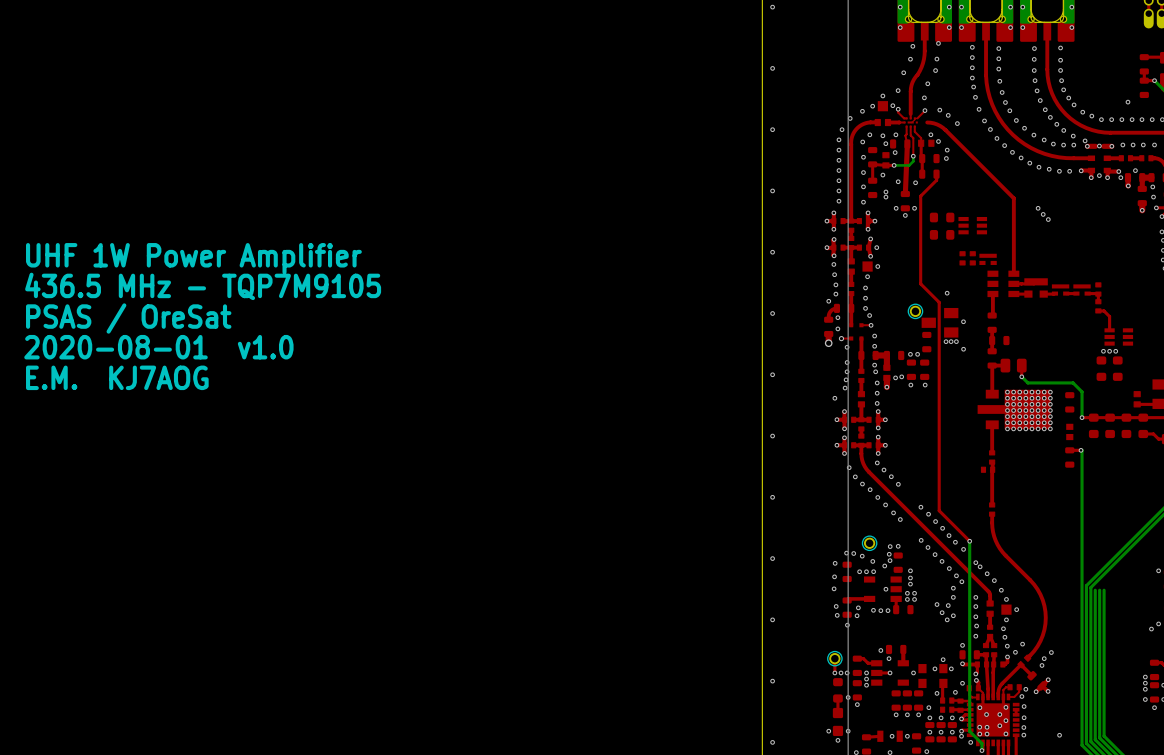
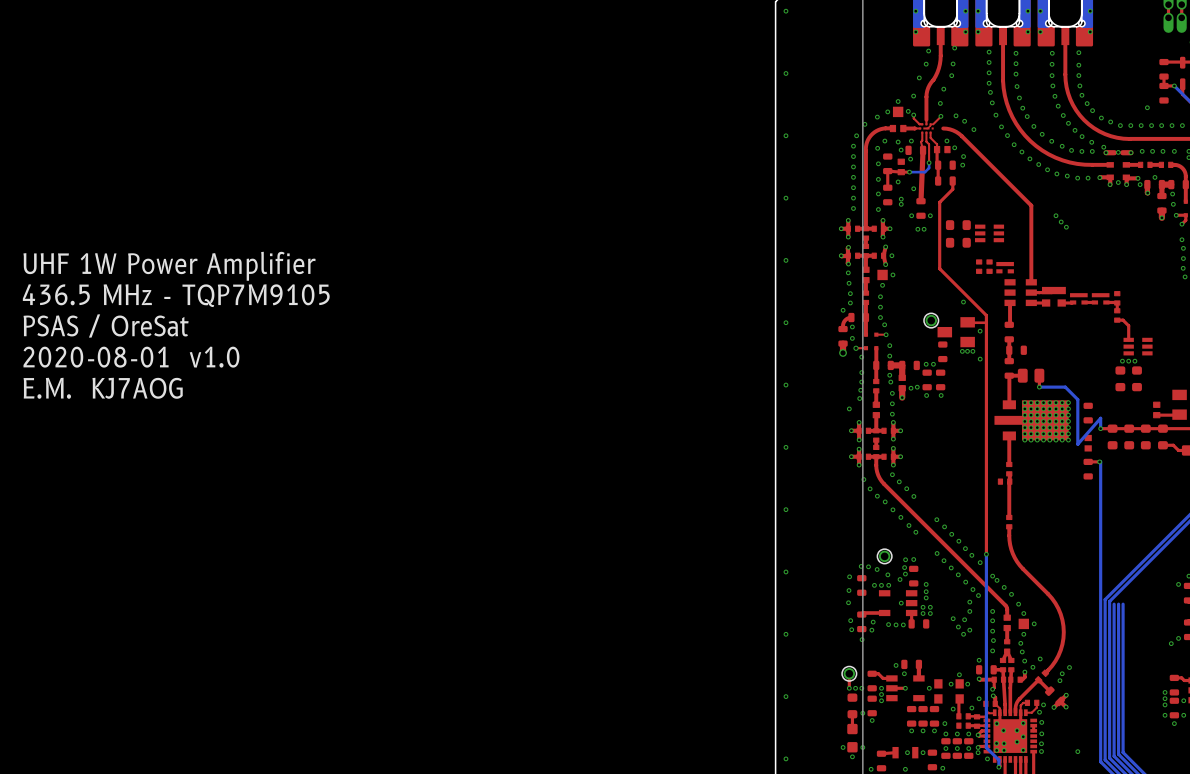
top track: (936, 180) (920, 196) (920, 283) (939, 302) (939, 510) (969, 541) -> (952, 187) (939, 202) (939, 268) (986, 315) (986, 554)
via: (915, 182) -> none
via: (905, 215) -> none
via: none -> (917, 229)
via: none -> (924, 229)
top track: none -> (967, 322) (986, 322)
bottom track: (1021, 376) (1027, 382) (1073, 382) (1082, 391) (1082, 407) -> (1039, 387) (1065, 387) (1077, 399) (1077, 444) (1100, 418)

